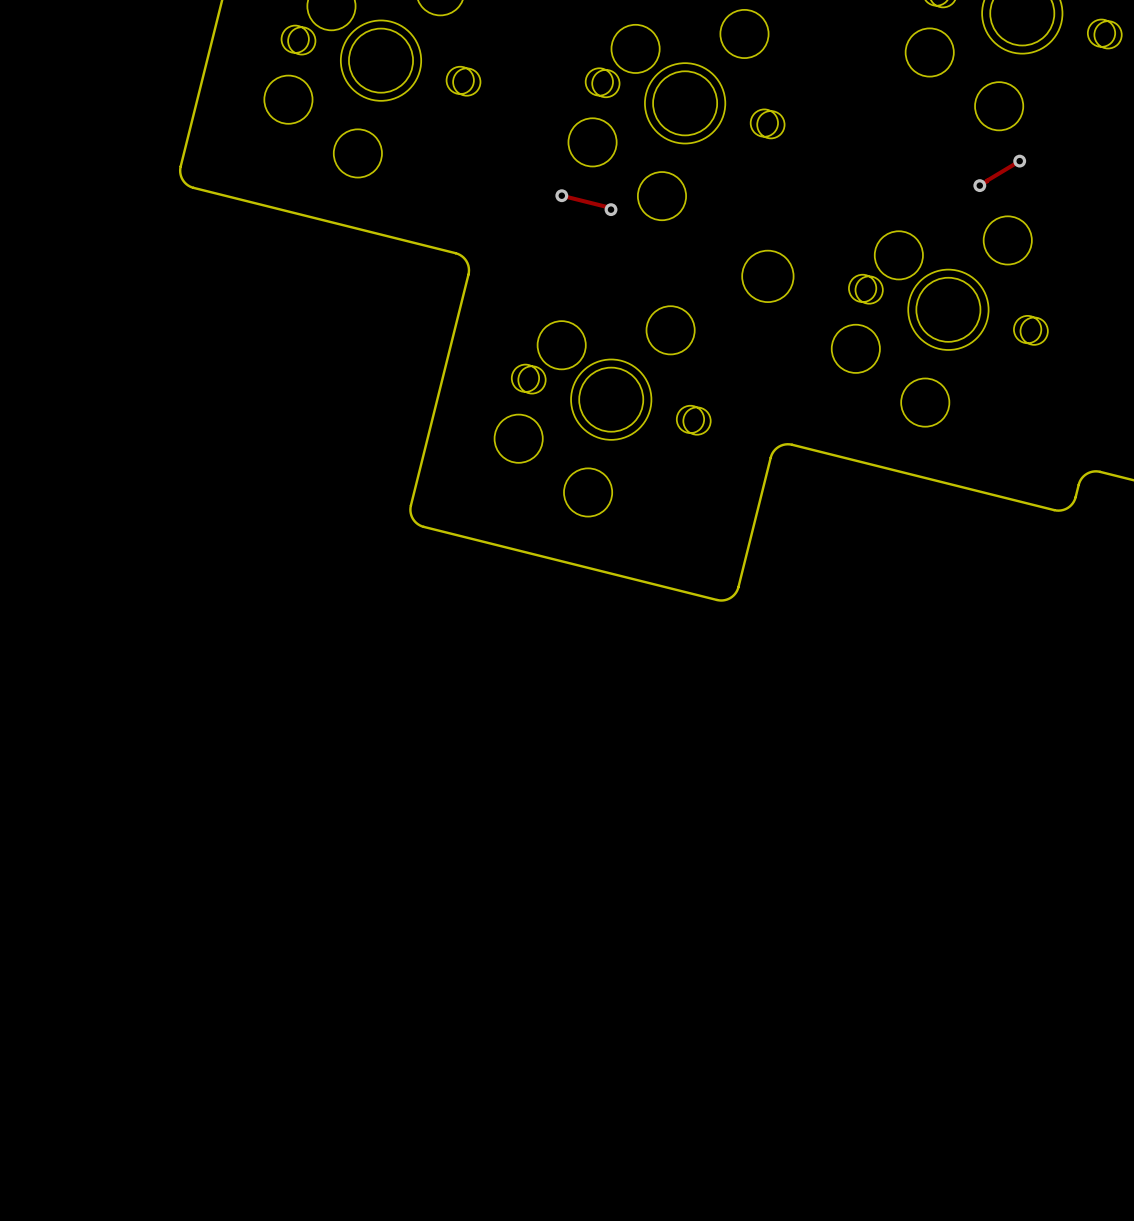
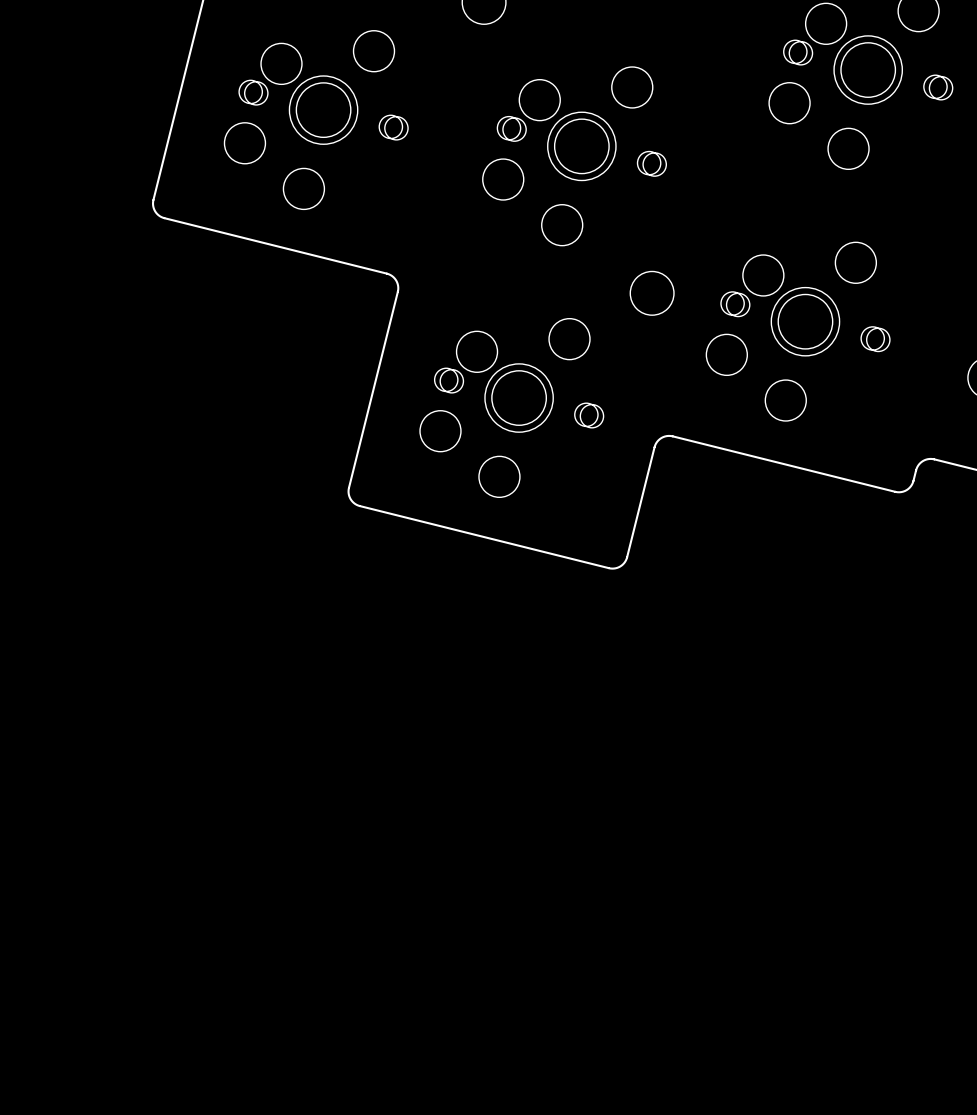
track: (1019, 161) (979, 185) -> none
via: (1019, 161) -> none
via: (979, 185) -> none
track: (561, 195) (609, 207) (611, 209) -> none
via: (561, 195) -> none
via: (611, 209) -> none

